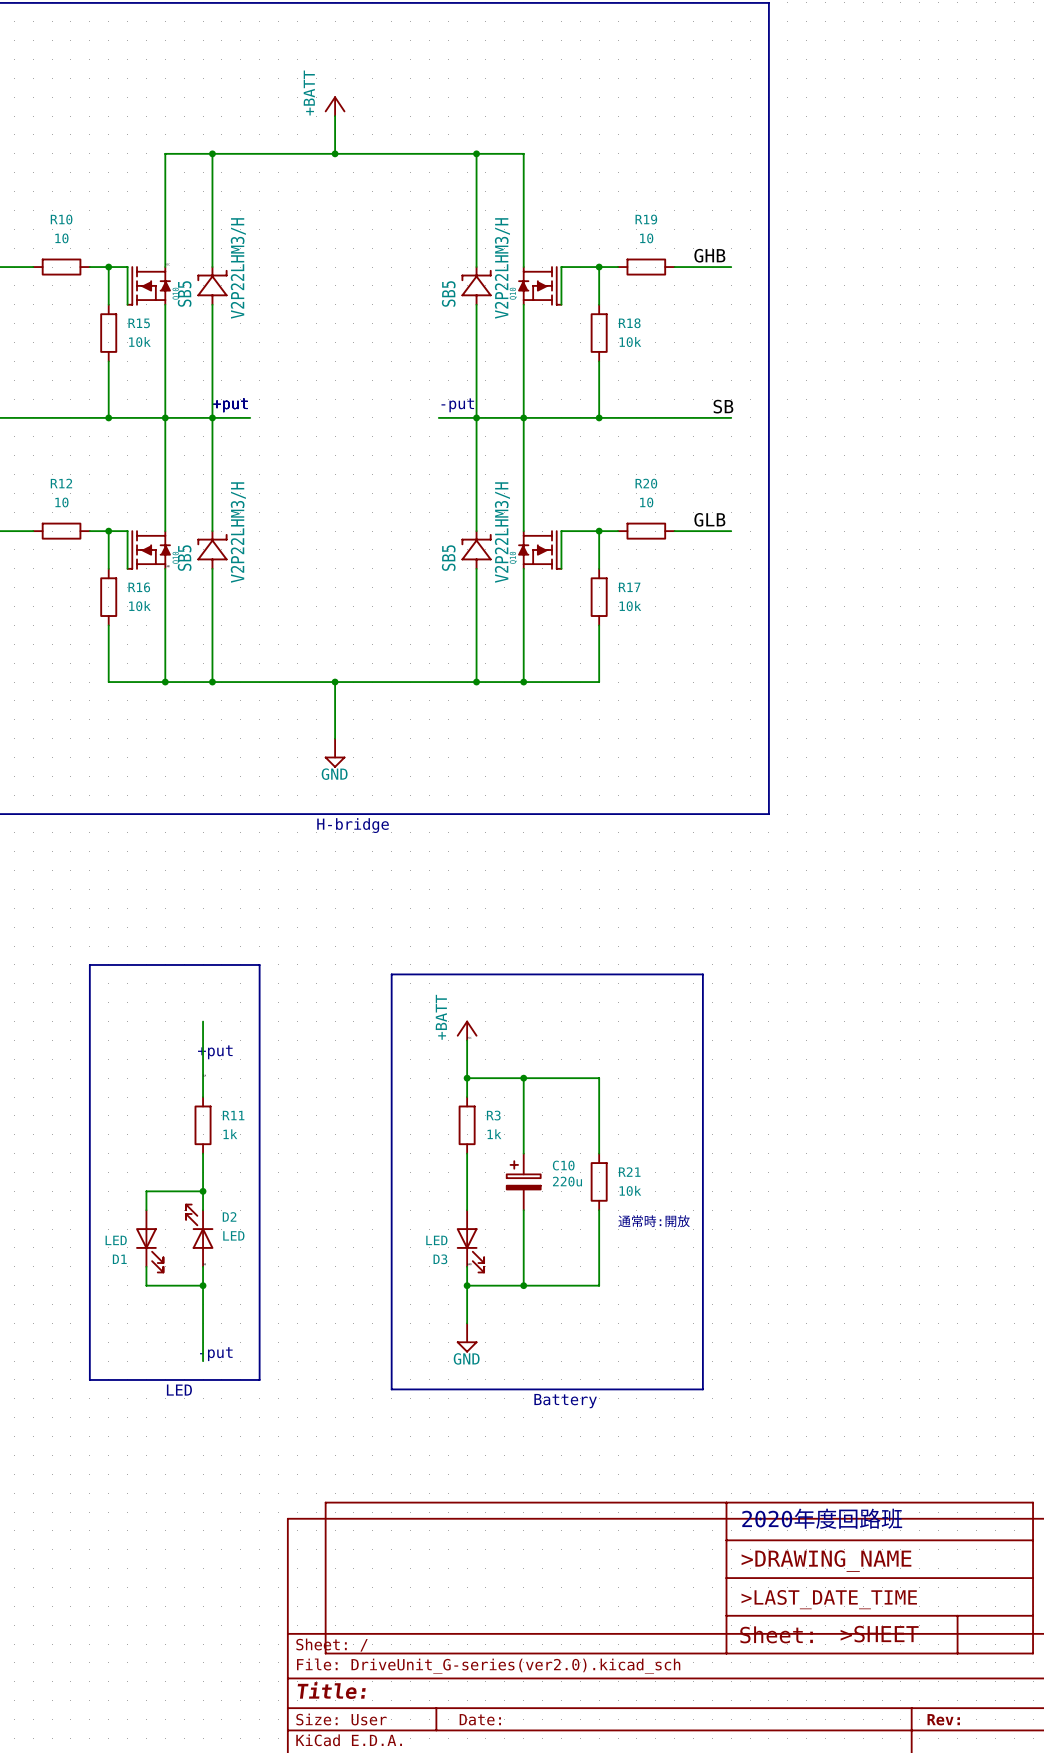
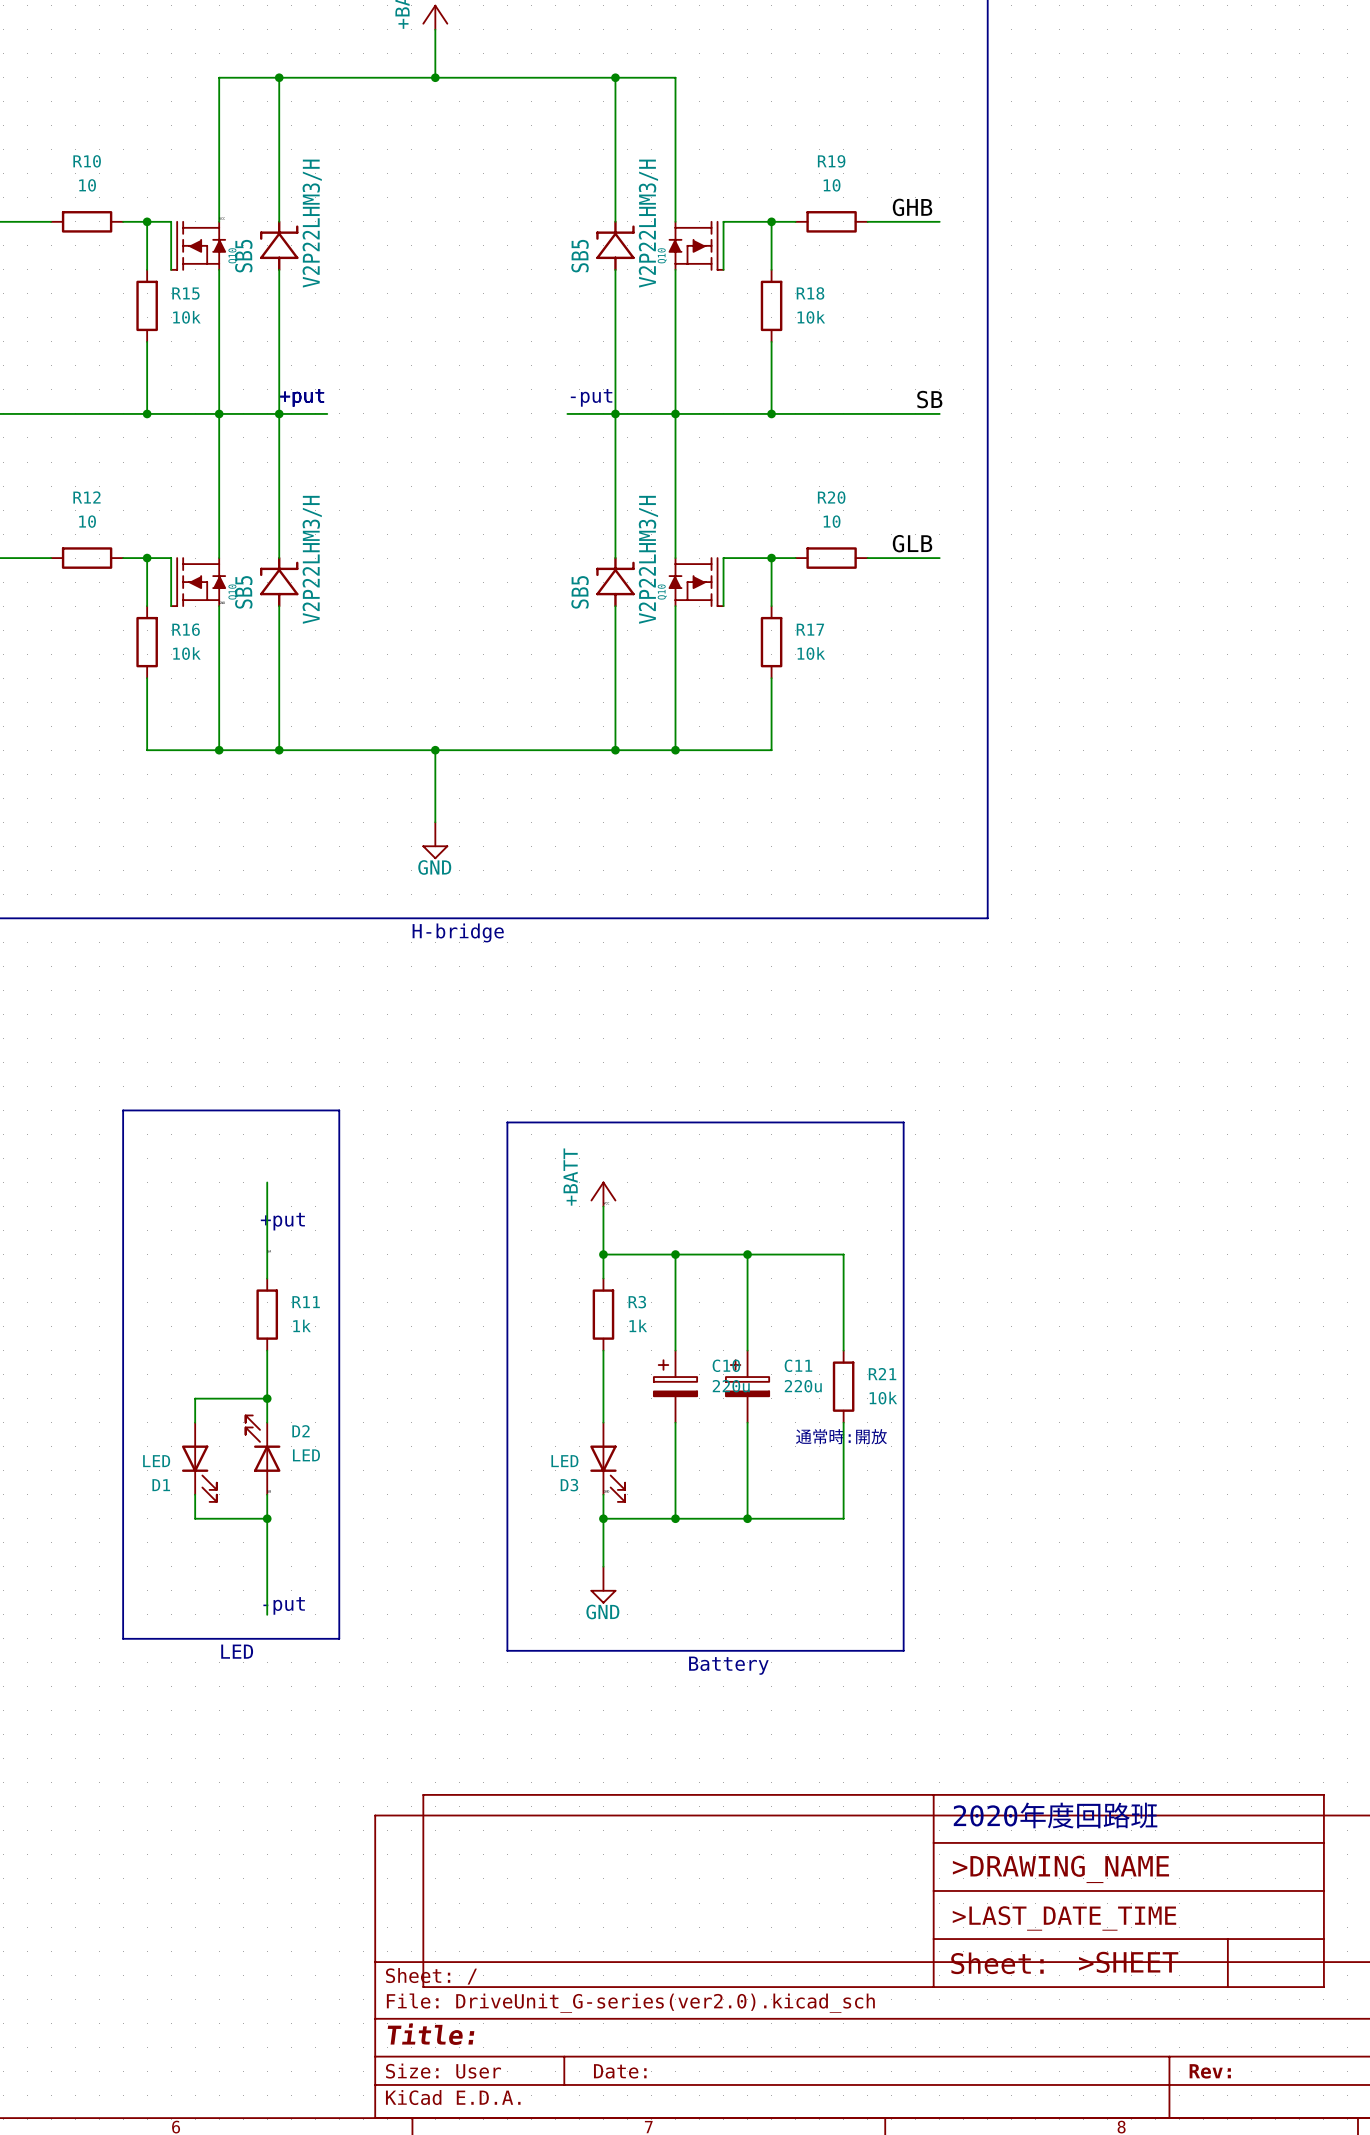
wire: none -> (747, 1254) (747, 1350)
junction: none -> (747, 1254)
wire: (599, 1078) (599, 1153) -> (771, 1254) (843, 1254) (843, 1350)
C11: none -> 220u (747, 1386)
R21 position: (599, 1181) -> (843, 1386)
wire: none -> (747, 1422) (747, 1518)
wire: (599, 1210) (599, 1285) -> (843, 1422) (843, 1518) (771, 1518)
junction: none -> (747, 1518)

